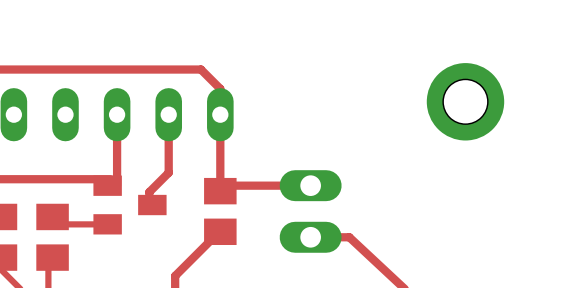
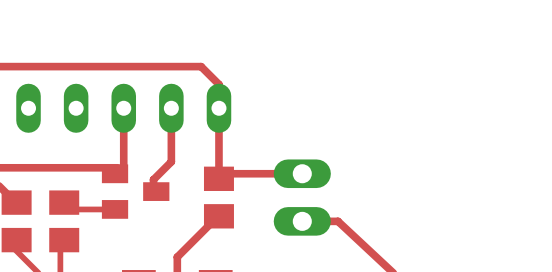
hole: (465, 101) -> none
via: (465, 101) -> none

